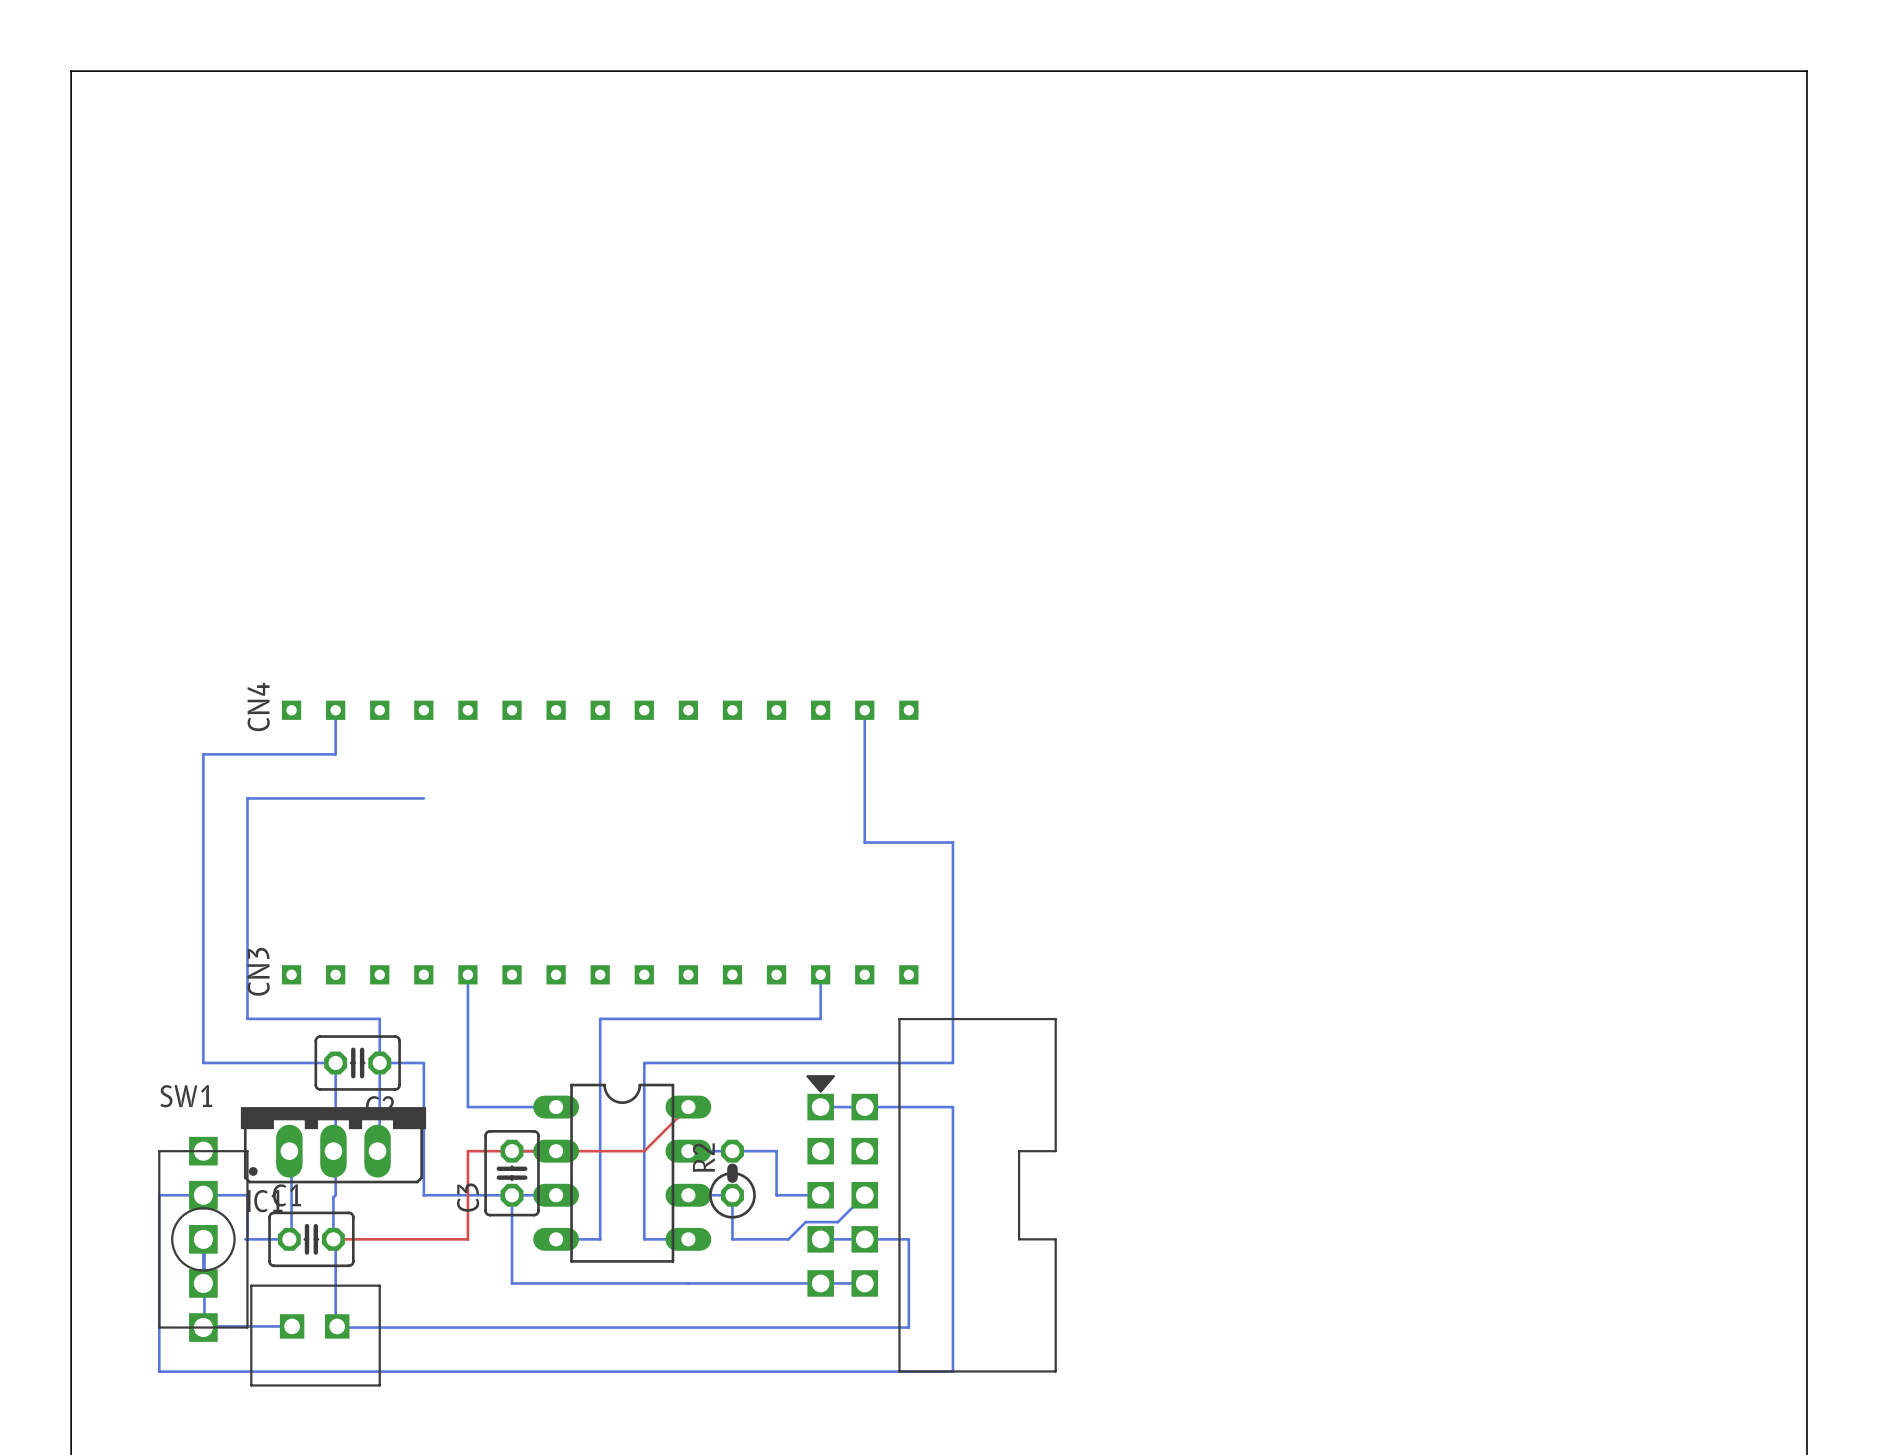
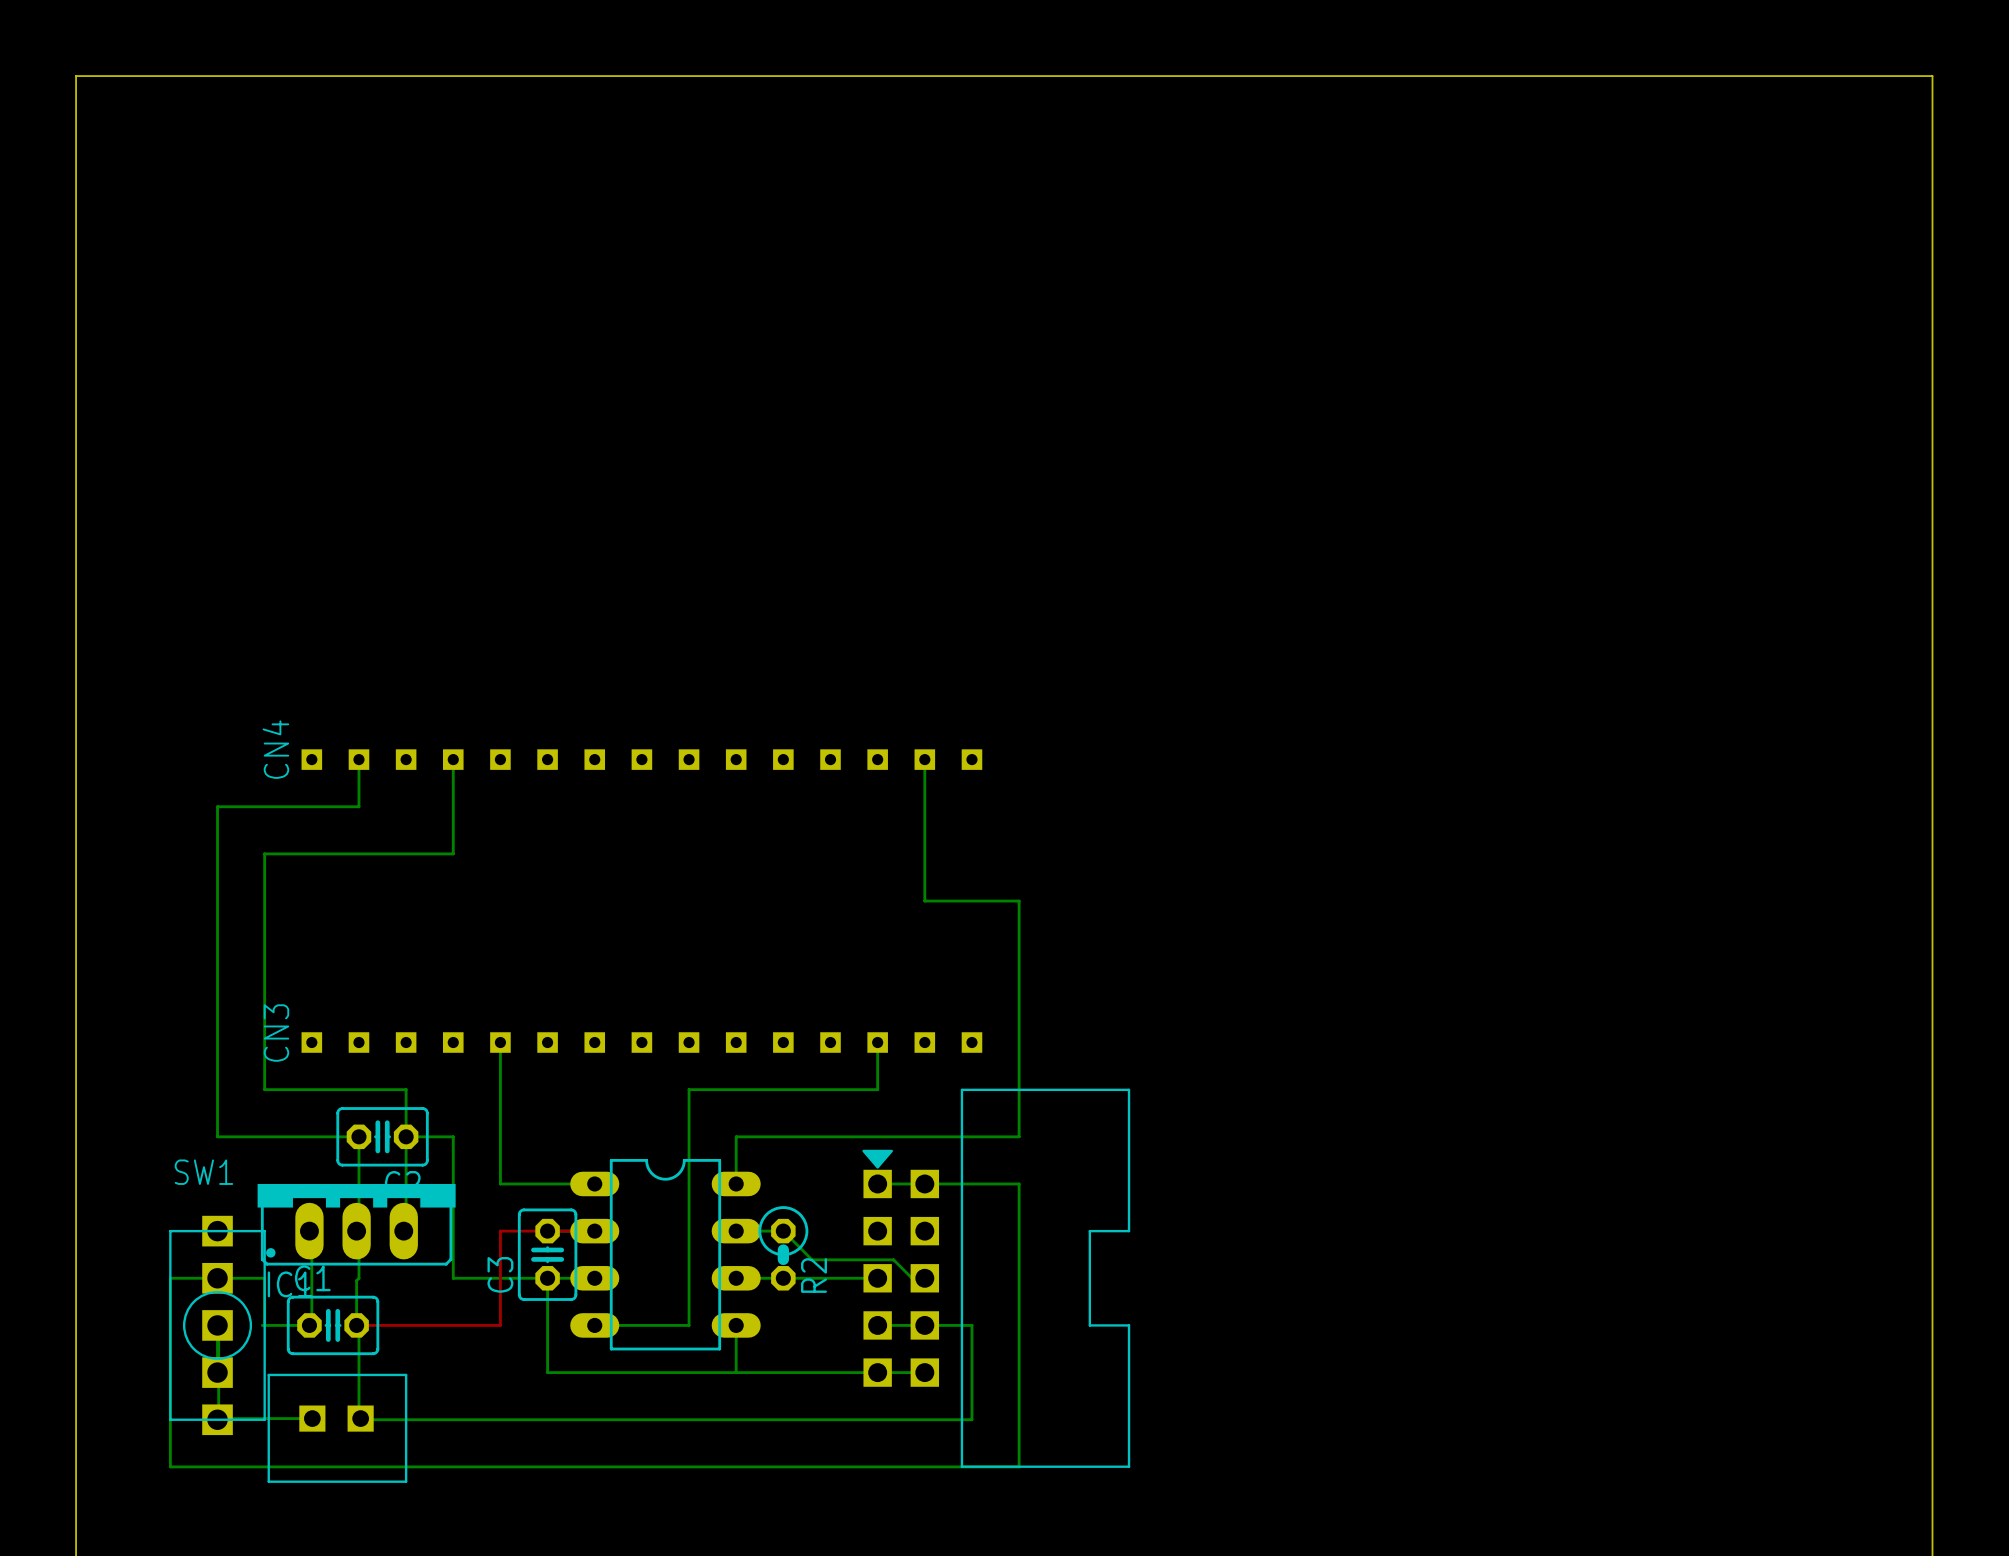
bottom track: none -> (453, 759) (453, 853)
bottom track: (644, 1018) (600, 1018) (600, 1239) -> (689, 1325) (641, 1325)
bottom track: (644, 1062) (688, 1062) -> (689, 1136) (689, 1089)
bottom track: none -> (736, 1136) (736, 1183)
top track: (688, 1107) (644, 1151) (556, 1151) -> none
bottom track: (732, 1151) (776, 1151) (776, 1195) -> (783, 1278) (830, 1278)
R2 rotation: 0° (732, 1179) -> 180° (783, 1248)
bottom track: (732, 1195) (732, 1239) (788, 1239) (805, 1222) (837, 1222) (864, 1195) -> (783, 1231) (812, 1259) (893, 1259) (912, 1278) (924, 1278)
bottom track: (644, 1239) (688, 1239) -> (736, 1372) (736, 1325)

